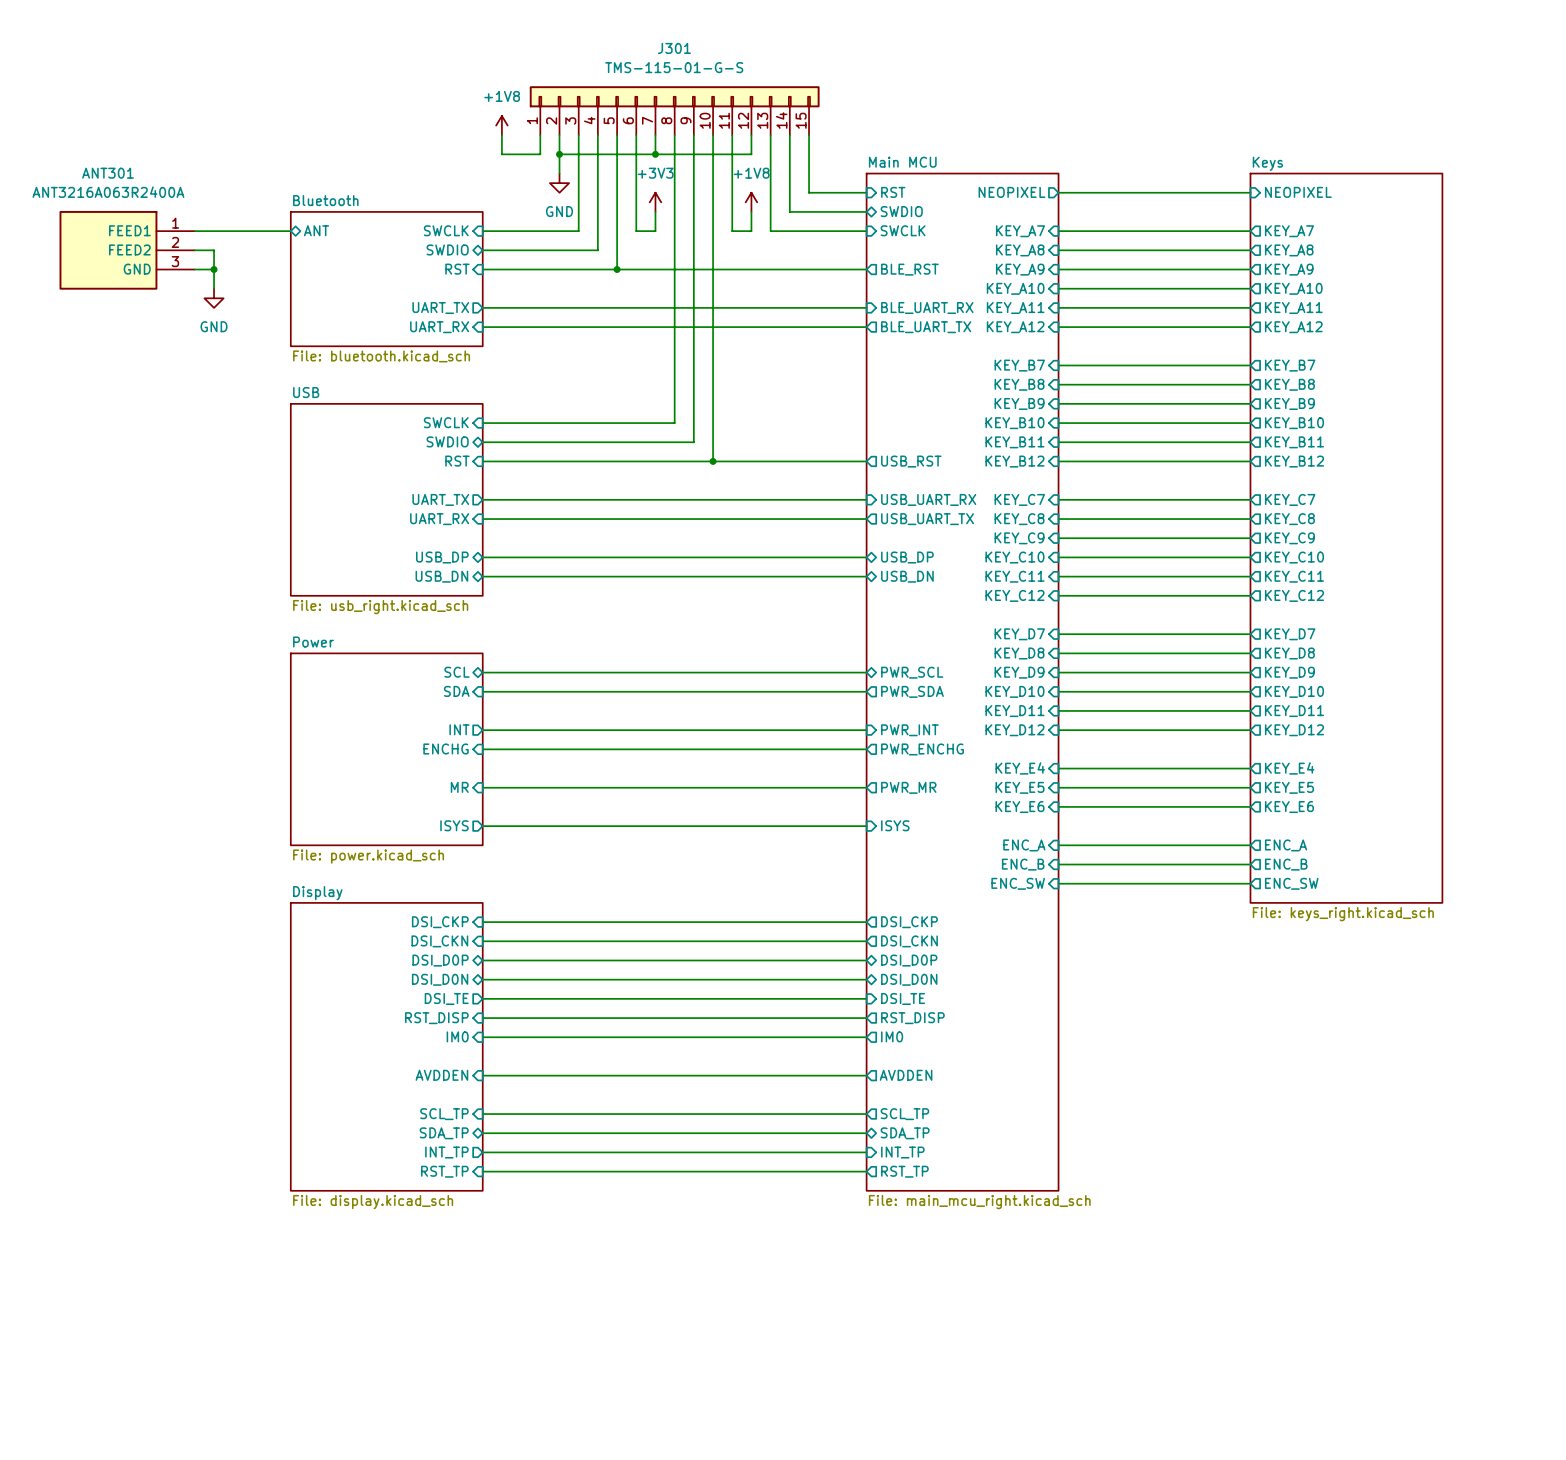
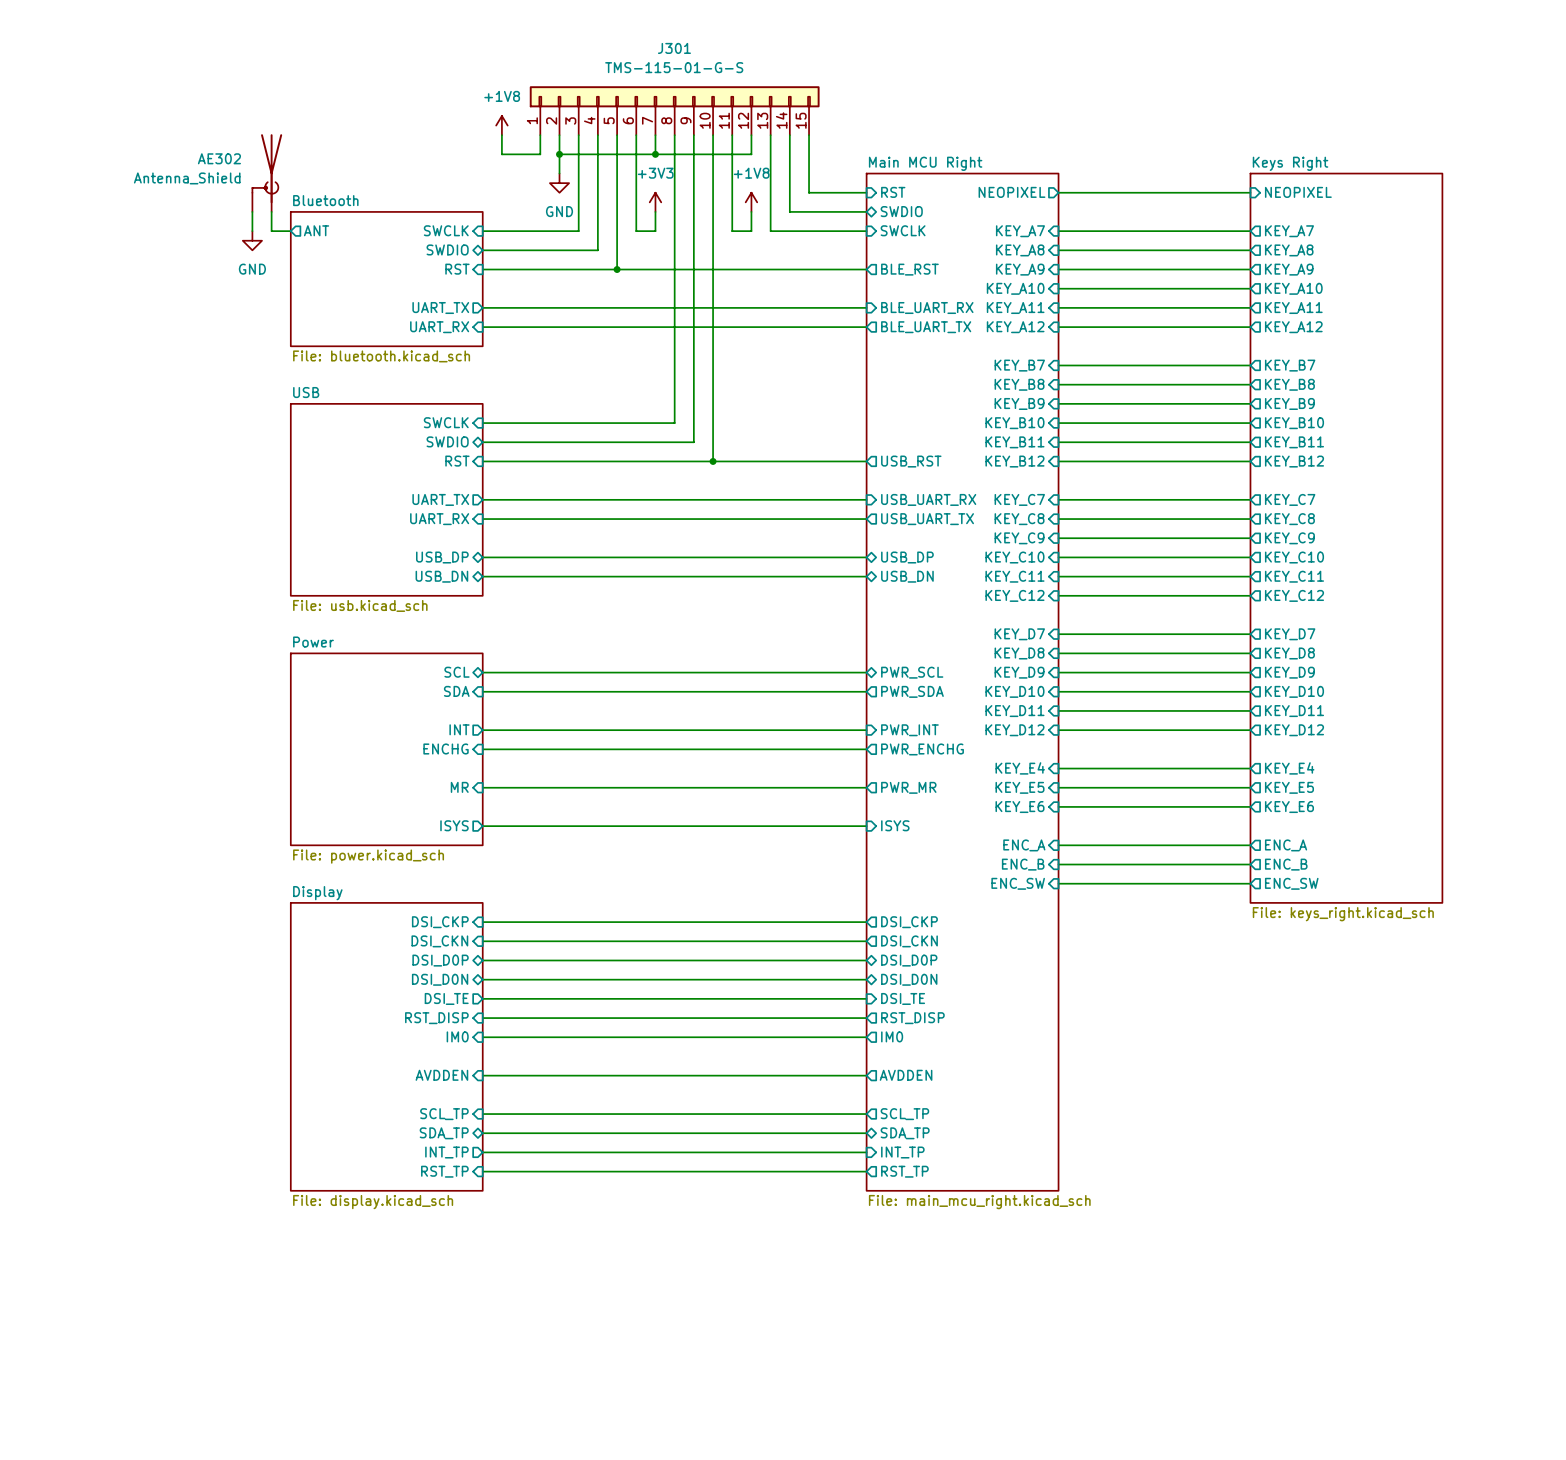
sheet Main MCU name: Main MCU (902, 162) -> Main MCU Right (925, 163)
sheet Keys name: Keys (1267, 163) -> Keys Right (1290, 163)
AE302: none -> Antenna_Shield (267, 173)
wire: none -> (252, 211) (252, 231)
sheet pin shape: bidirectional (316, 230) -> output (316, 230)
wire: (194, 231) (271, 231) -> (271, 211) (271, 231)
ANT301: ANT3216A063R2400A (127, 250) -> none
wire: (194, 250) (214, 250) (214, 288) -> none
wire: (194, 269) (214, 269) -> none
junction: (214, 269) -> none
power symbol position: GND (214, 298) -> GND (252, 240)
sheet USB value: File: usb_right.kicad_sch (380, 607) -> File: usb.kicad_sch (360, 605)

